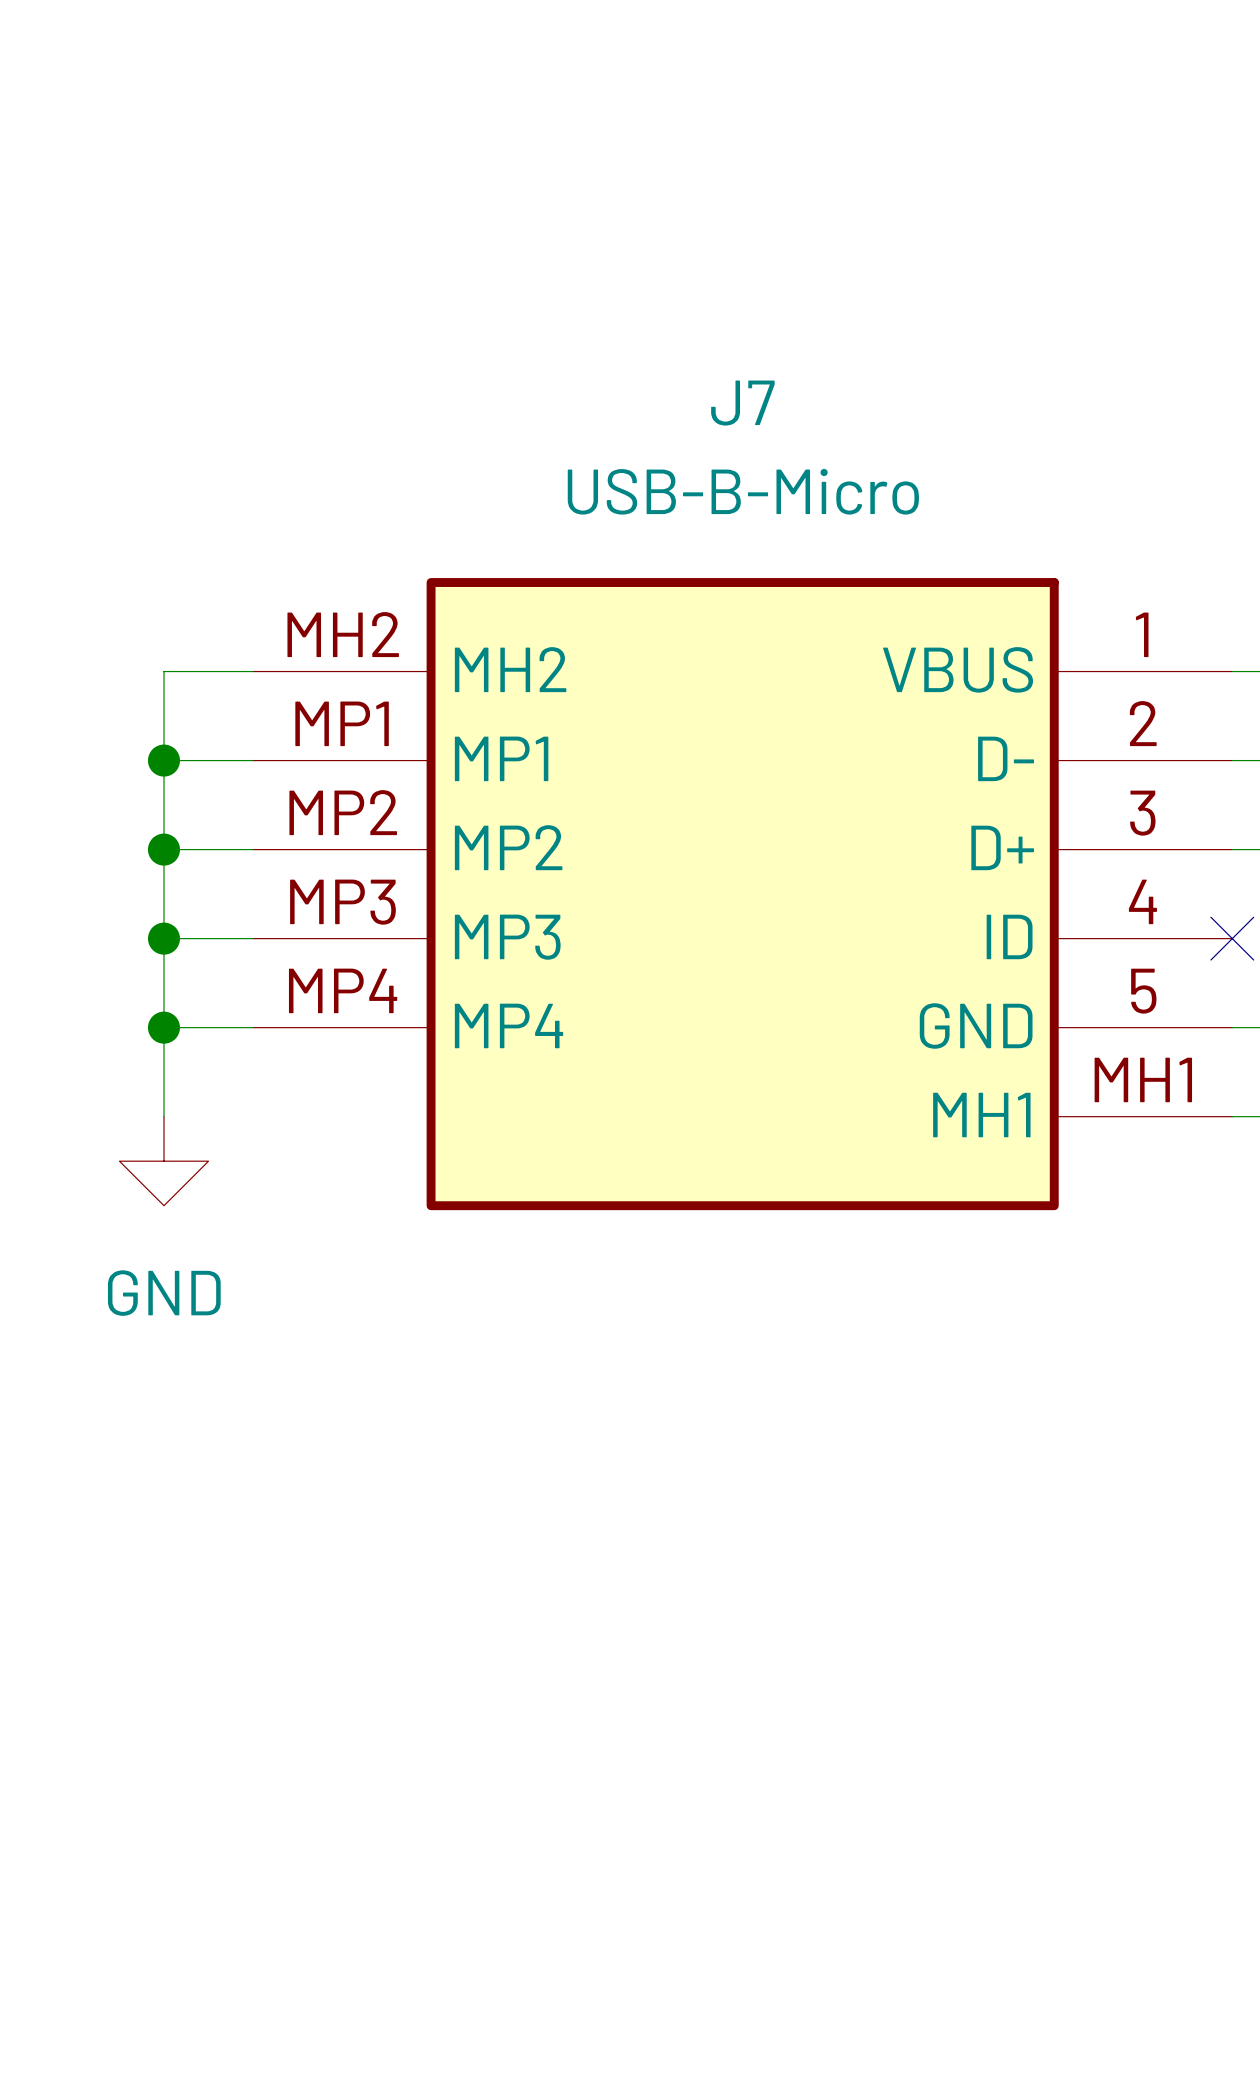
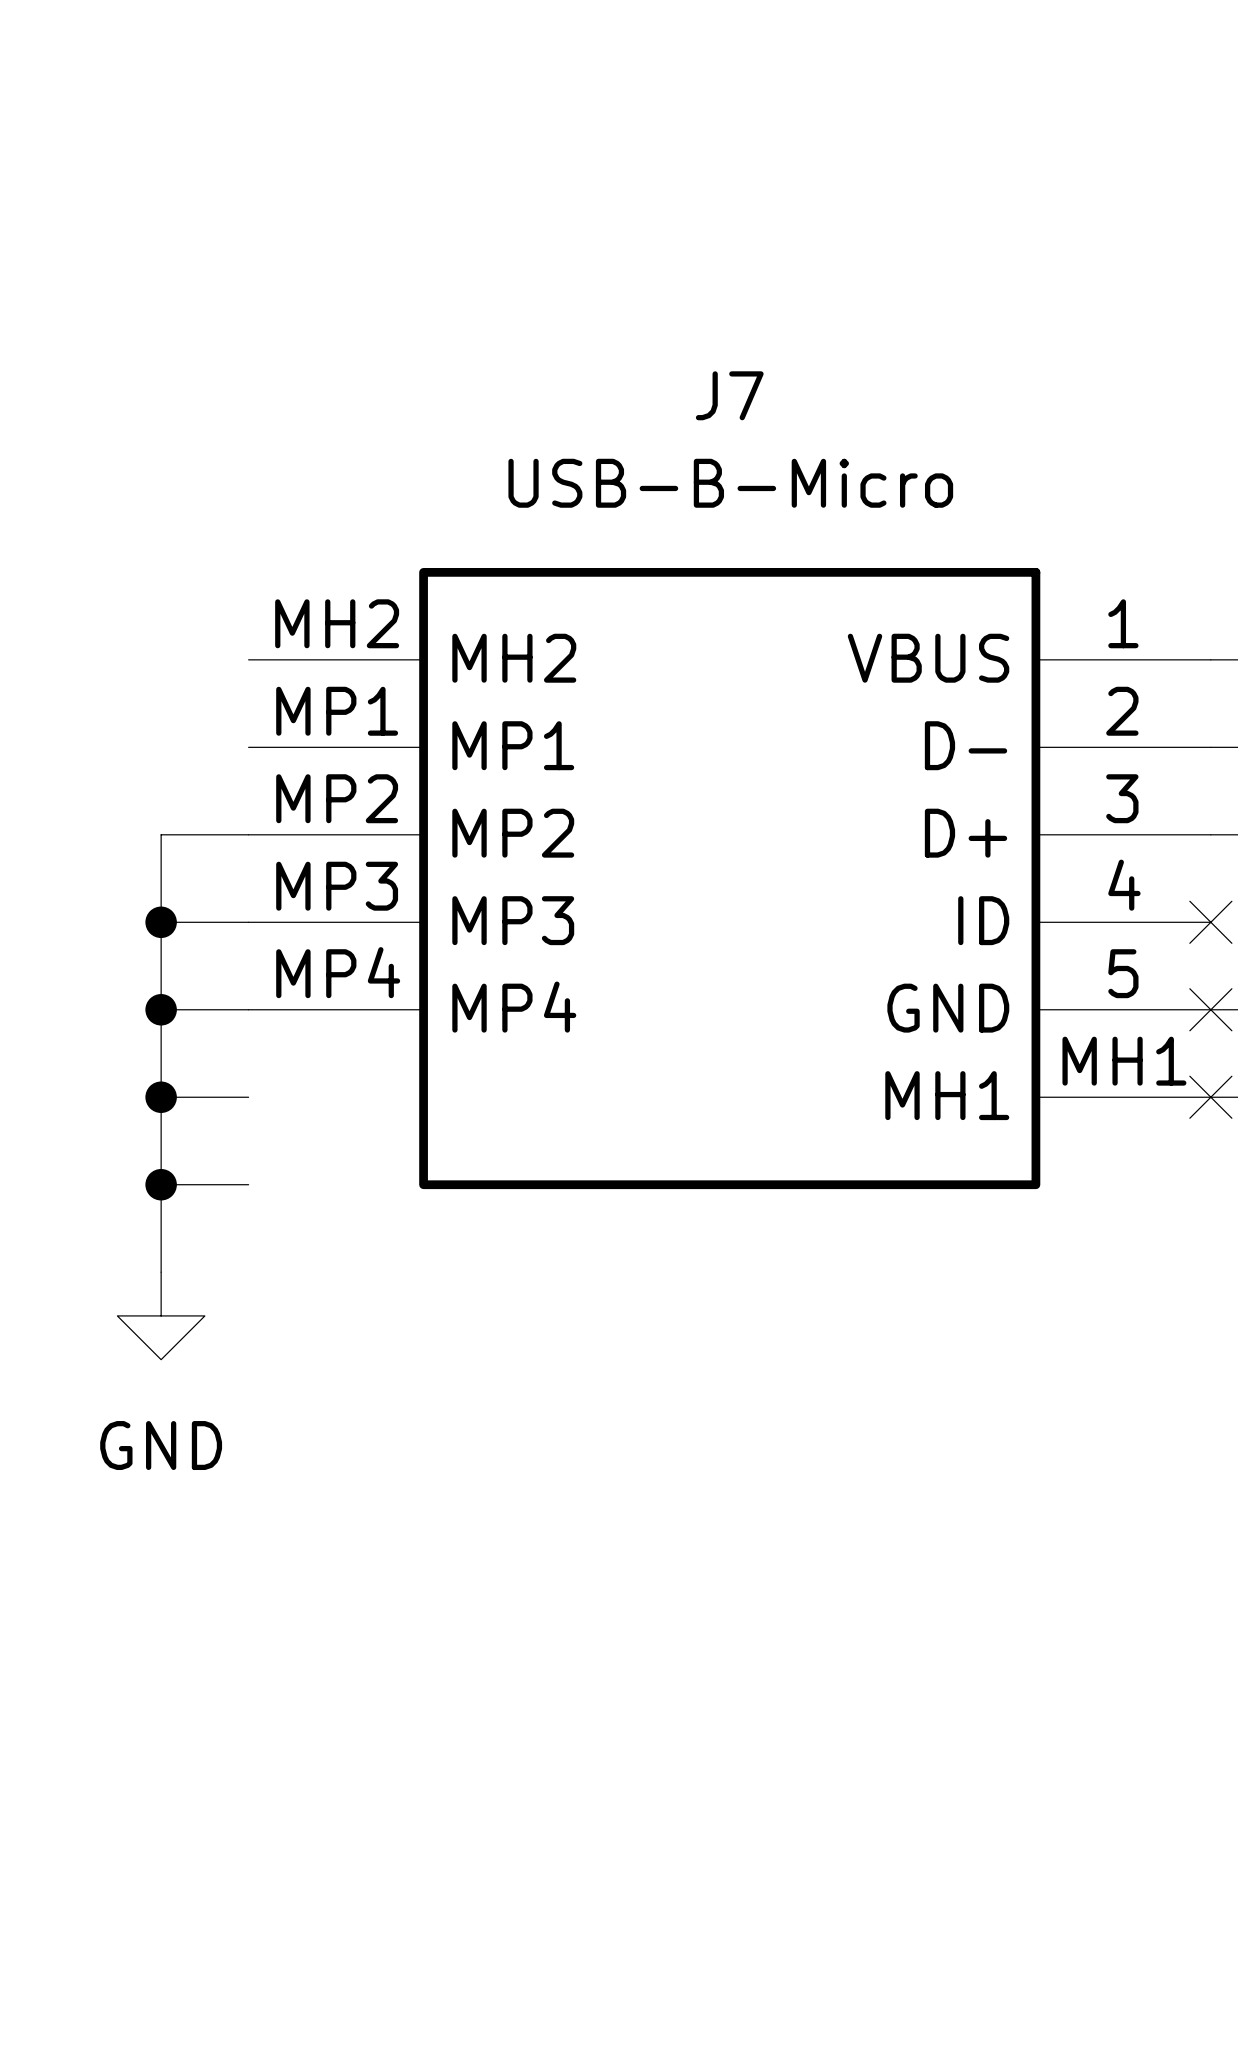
wire: (253, 671) (163, 671) (163, 849) -> (248, 1097) (161, 1097) (161, 1272)
wire: (163, 760) (253, 760) -> (161, 1184) (248, 1184)
junction: (163, 760) -> none
junction: (163, 849) -> none
no-connect mark: none -> (1210, 1009)
junction: none -> (161, 1097)
no-connect mark: none -> (1210, 1097)
power symbol position: GND (163, 1161) -> GND (161, 1315)
junction: none -> (161, 1184)

